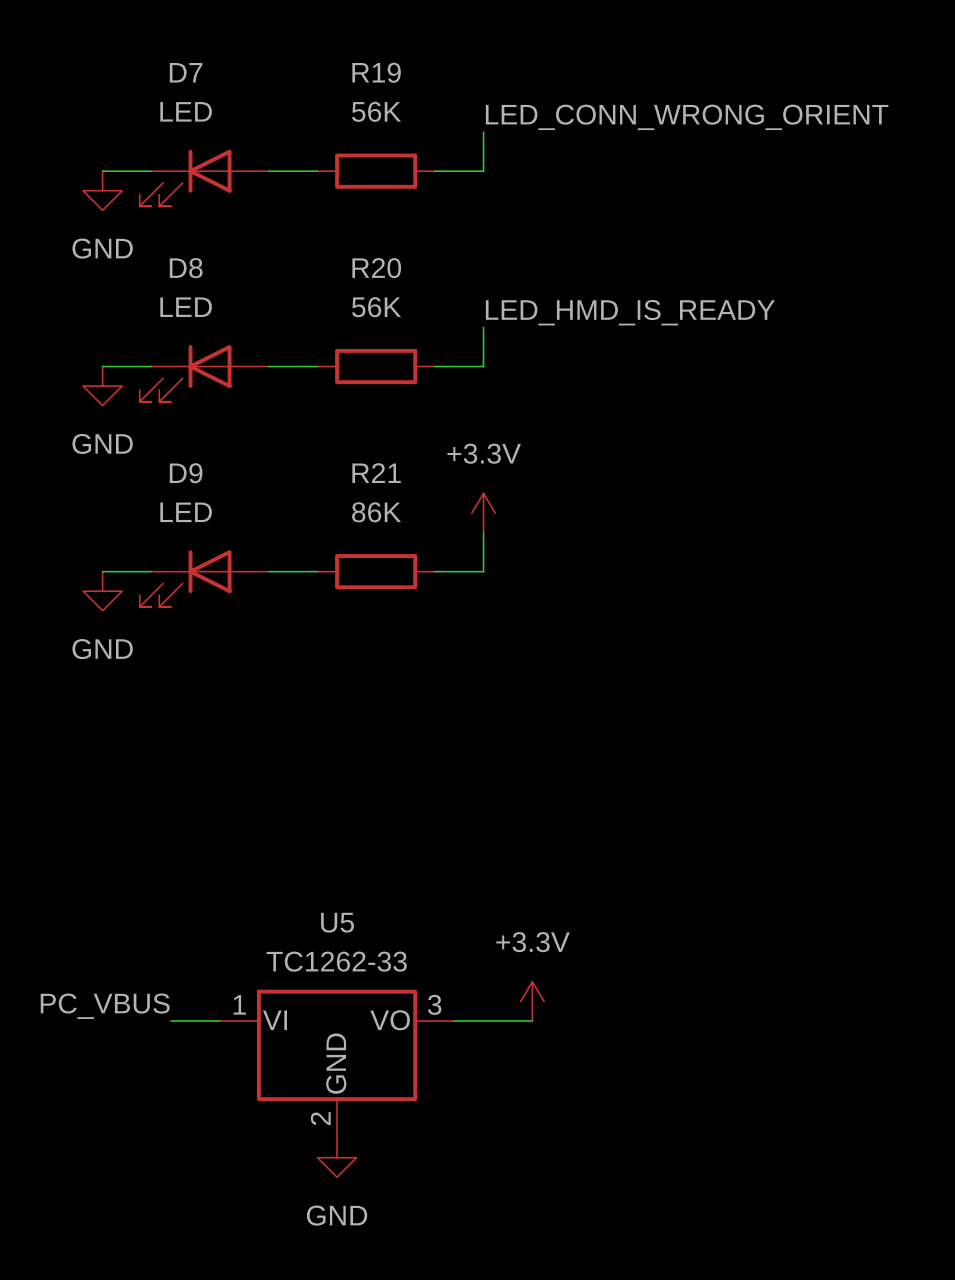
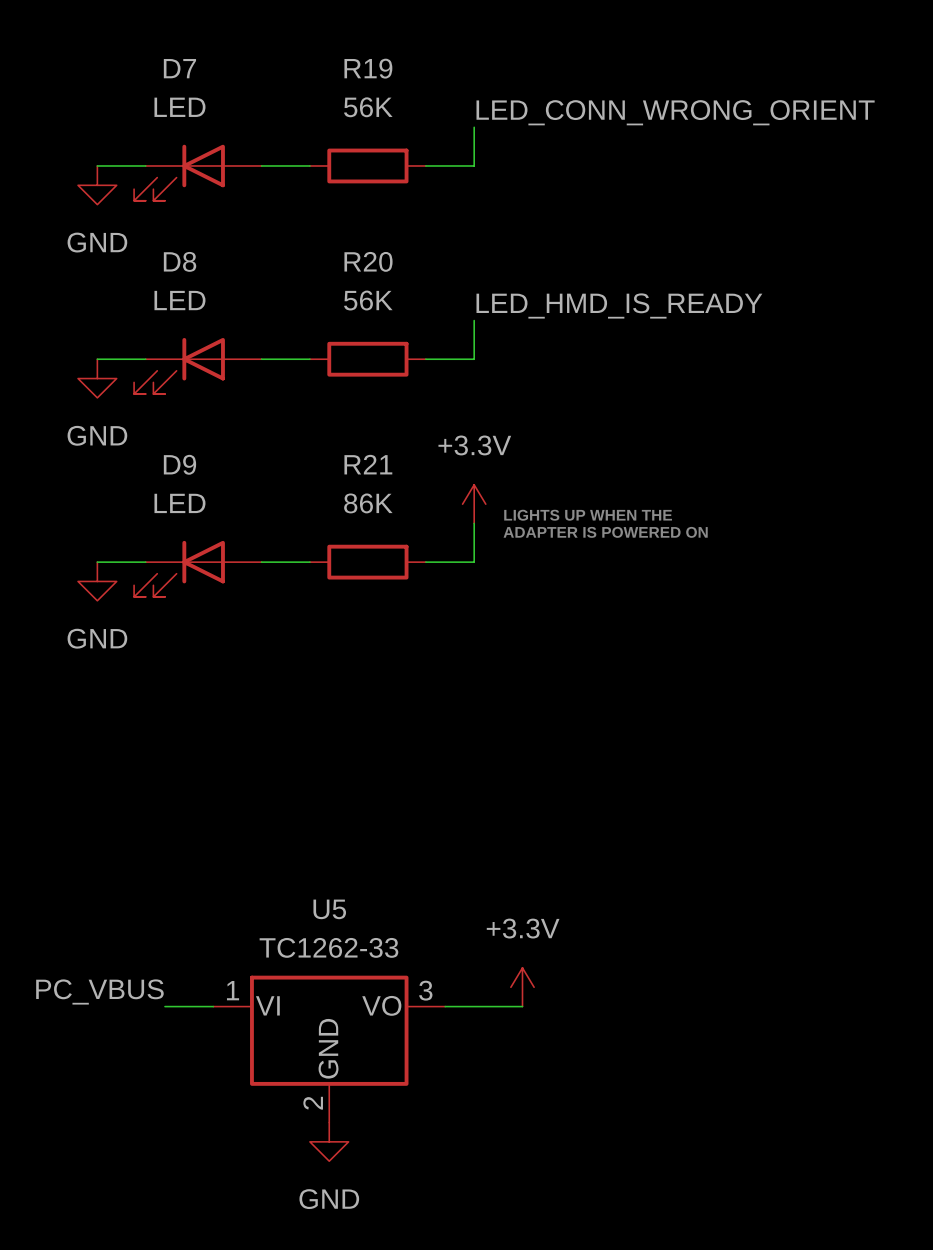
text: none -> LIGHTS UP WHEN THE (588, 515)
text: none -> ADAPTER IS POWERED ON (605, 532)

